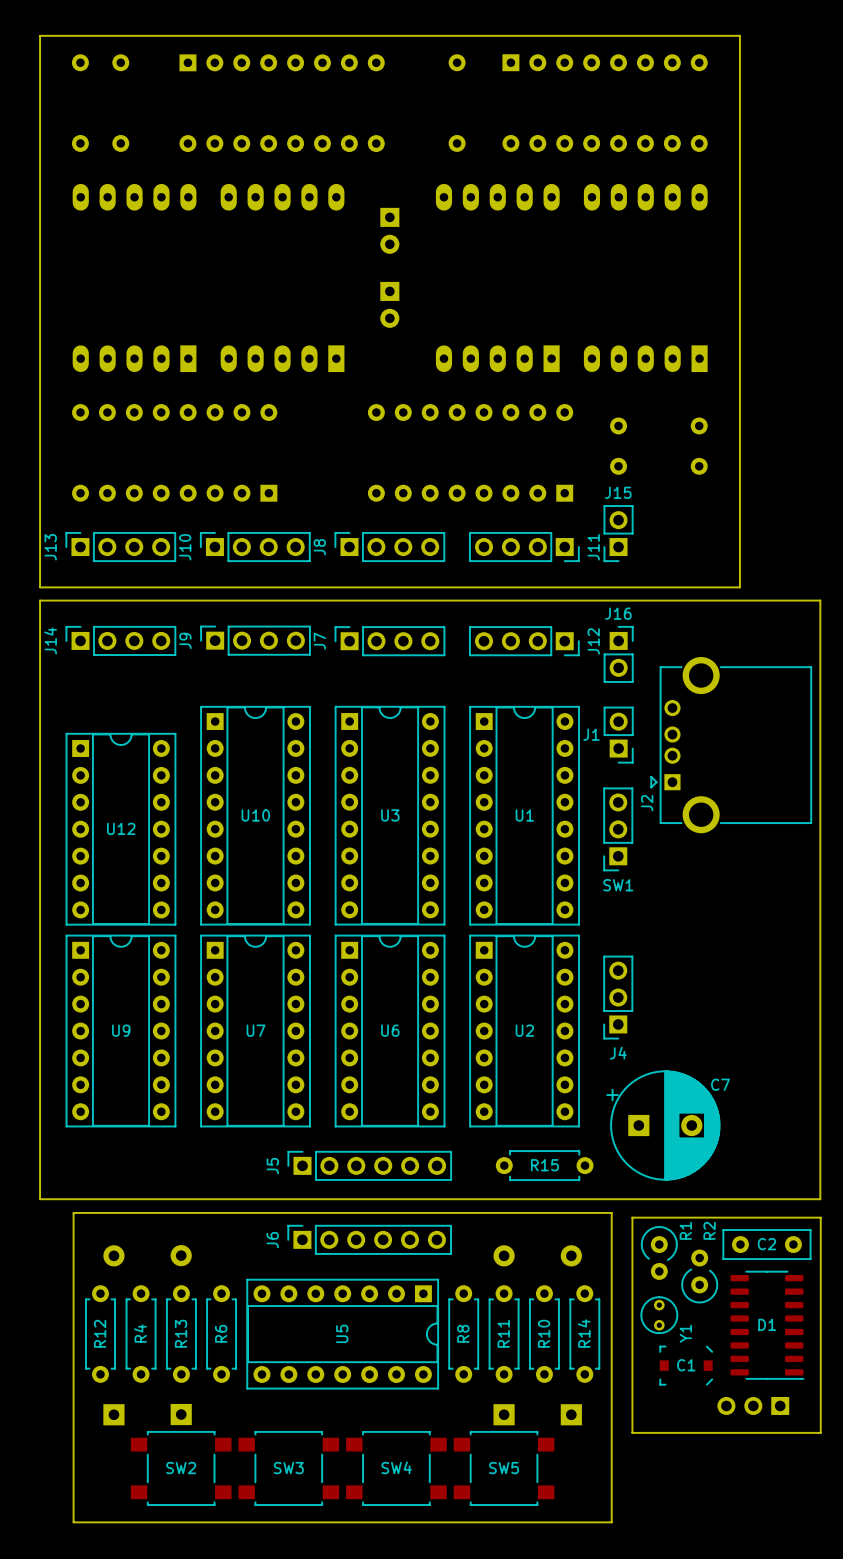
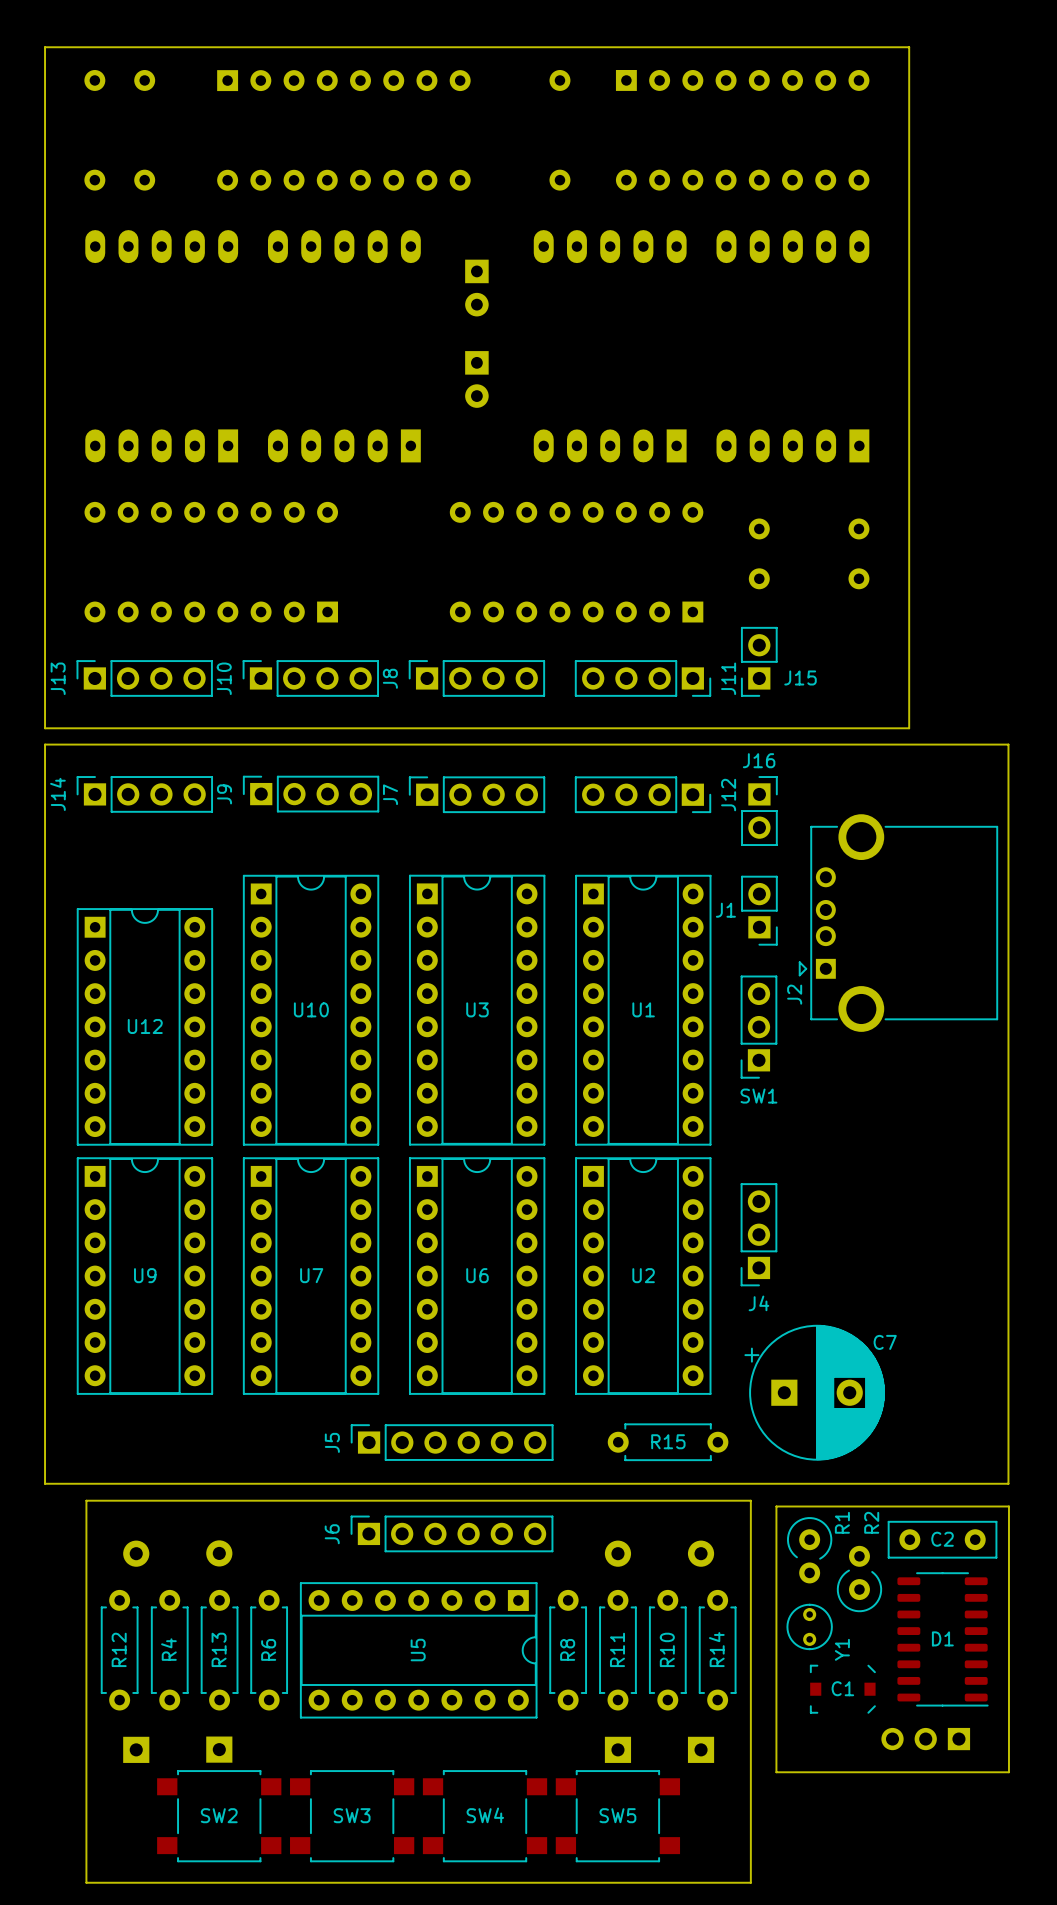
J15 name position: J15 (618, 492) -> J15 (800, 677)

